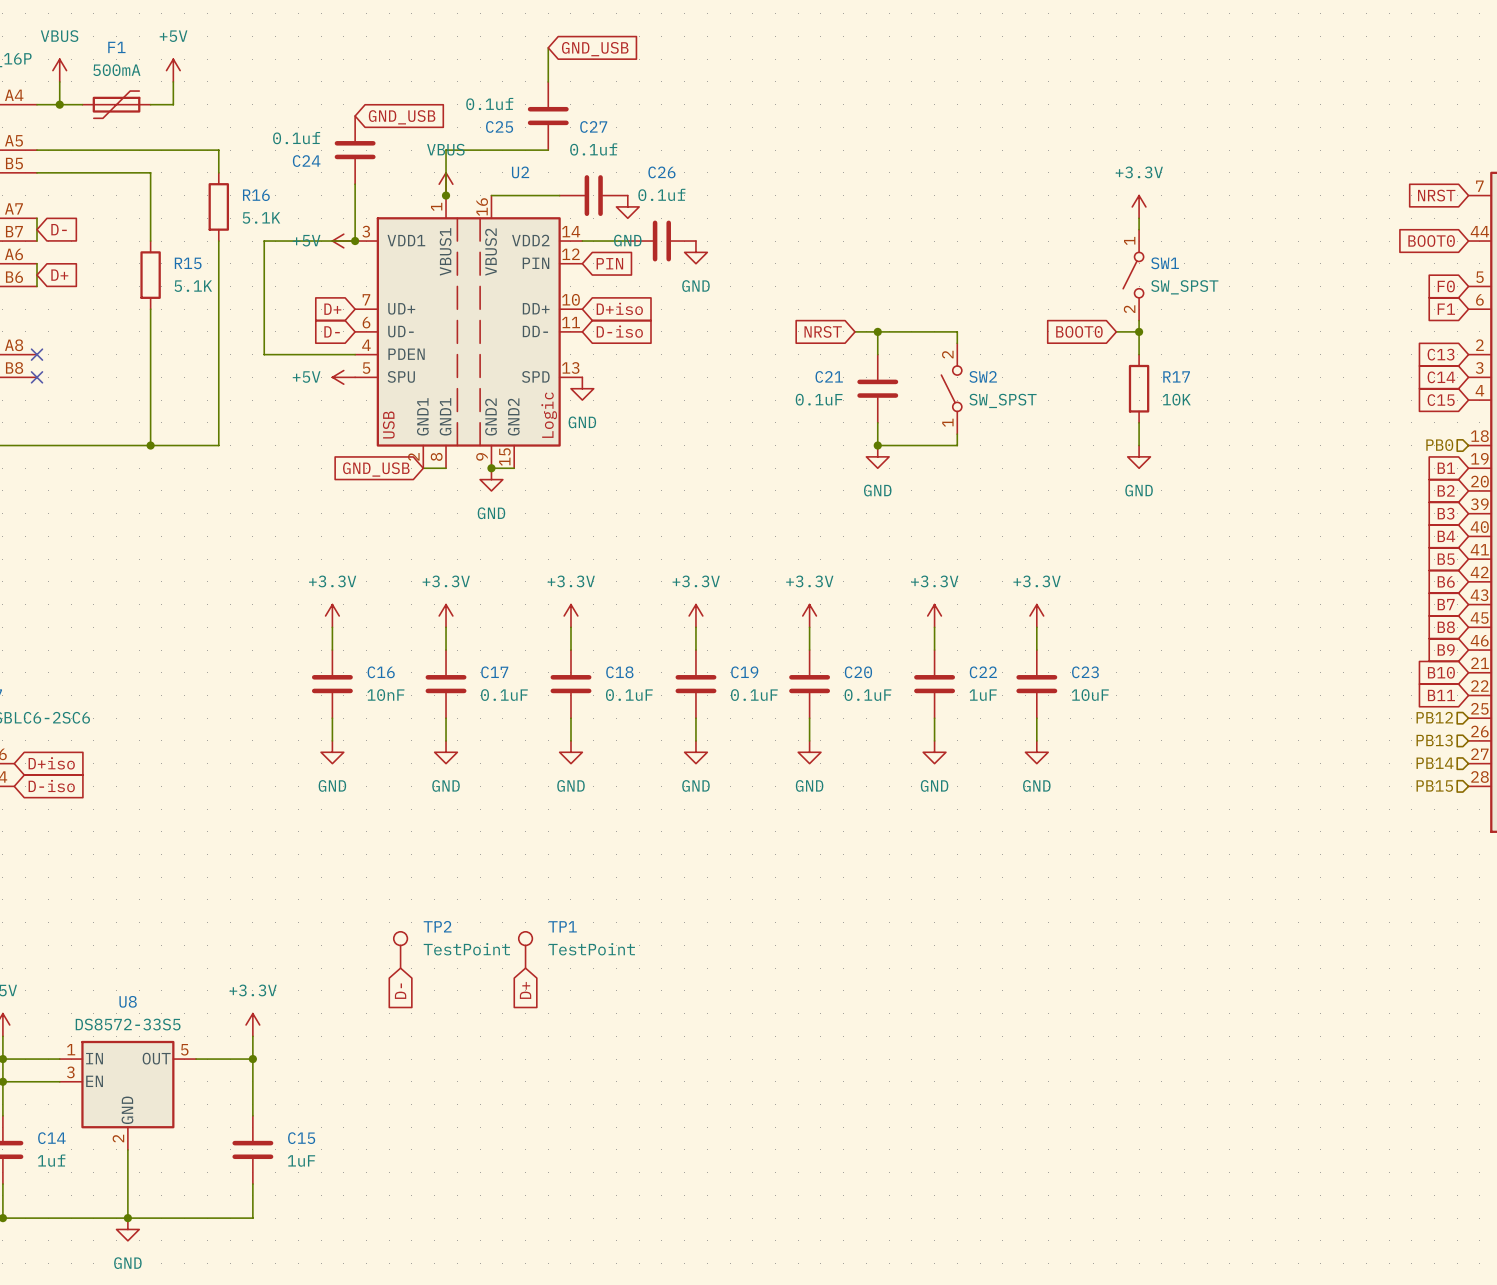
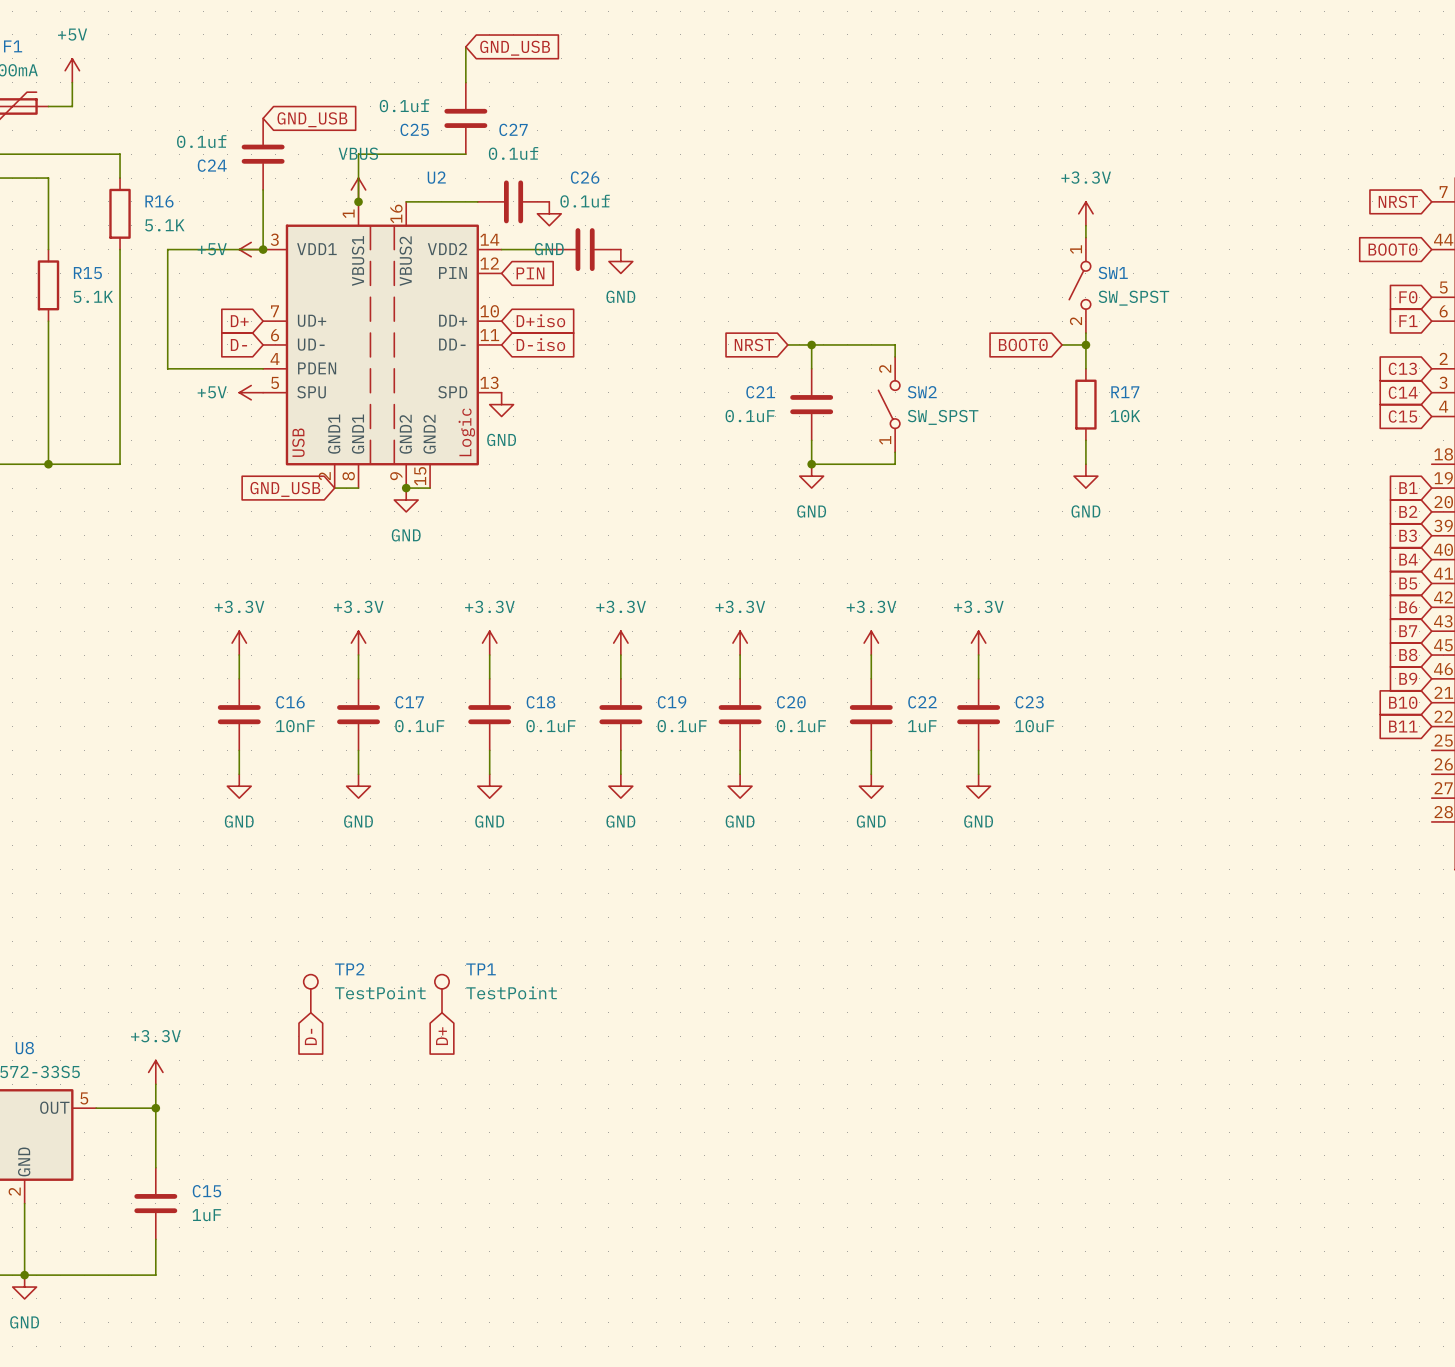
hierarchical label: PB0 (1439, 445) -> none
hierarchical label: PB12 (1434, 717) -> none
hierarchical label: PB13 (1434, 740) -> none
hierarchical label: PB14 (1435, 763) -> none
hierarchical label: PB15 (1434, 786) -> none

